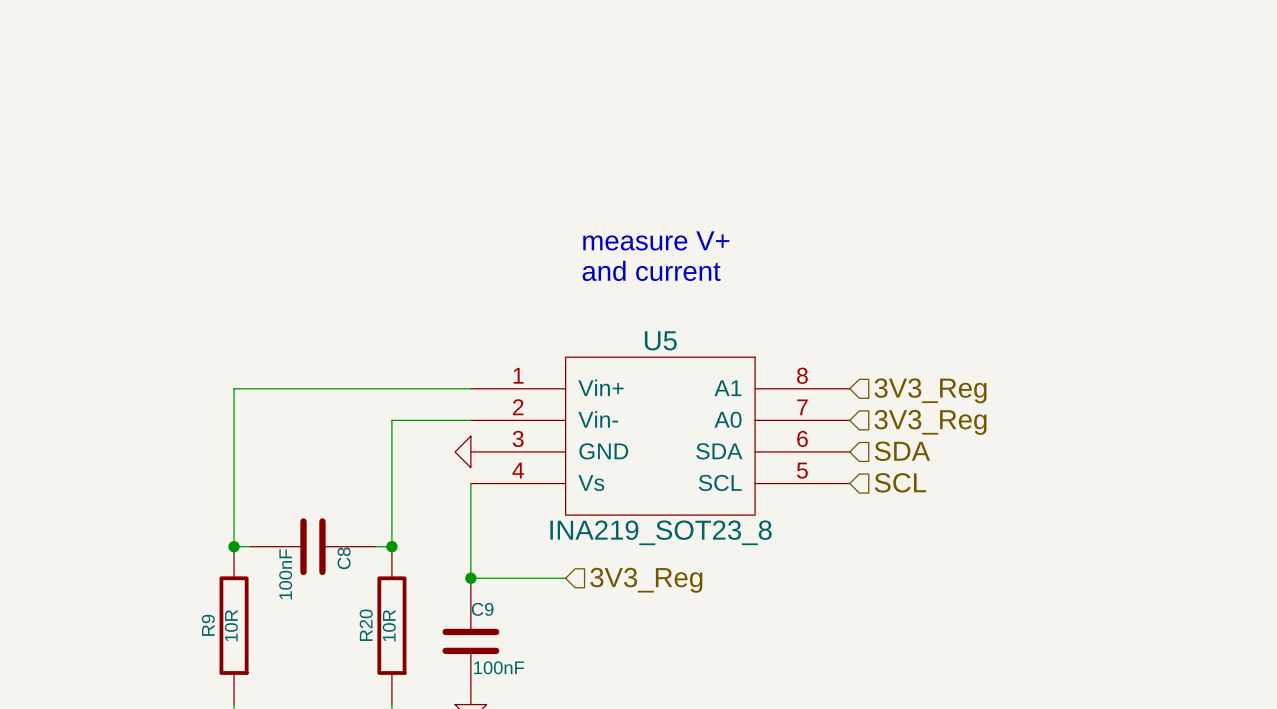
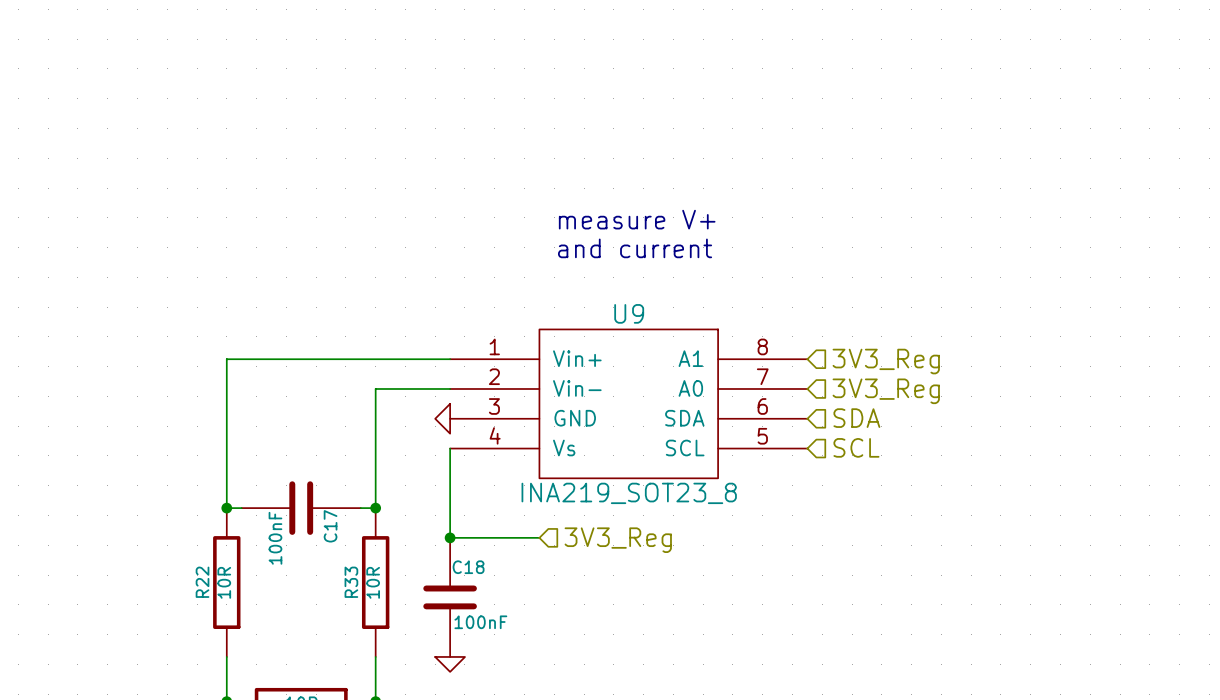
U5 name: U5 (660, 340) -> U9 (629, 313)
C8 name: C8 (344, 558) -> C17 (330, 526)
C9 name: C9 (482, 609) -> C18 (468, 567)
R9 name: R9 (208, 625) -> R22 (202, 582)
R20 name: R20 (366, 625) -> R33 (351, 582)

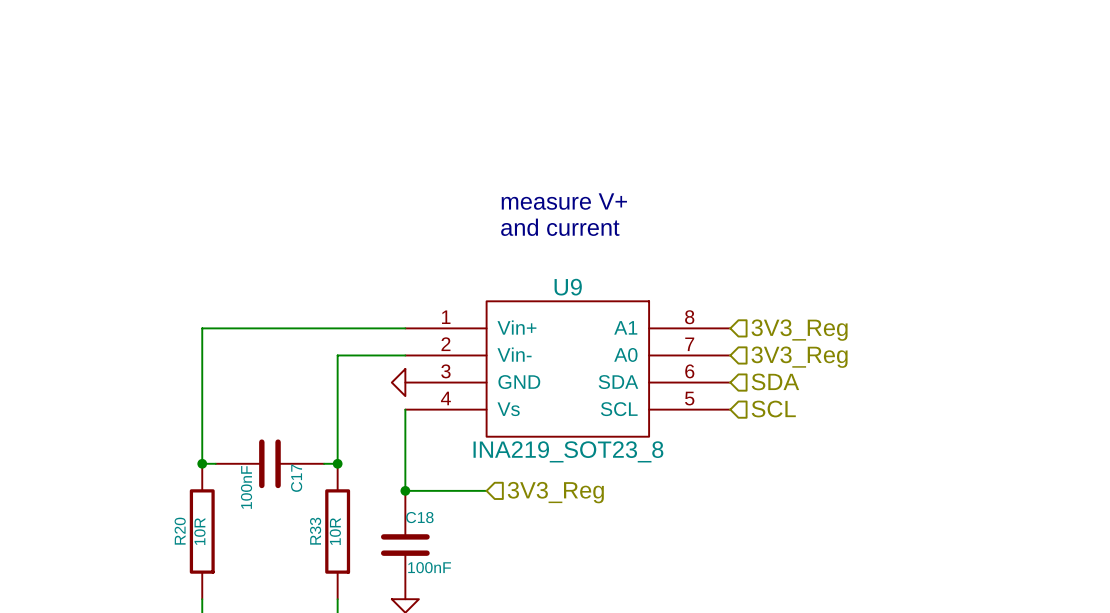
R22 name: R22 (202, 582) -> R20 (180, 531)

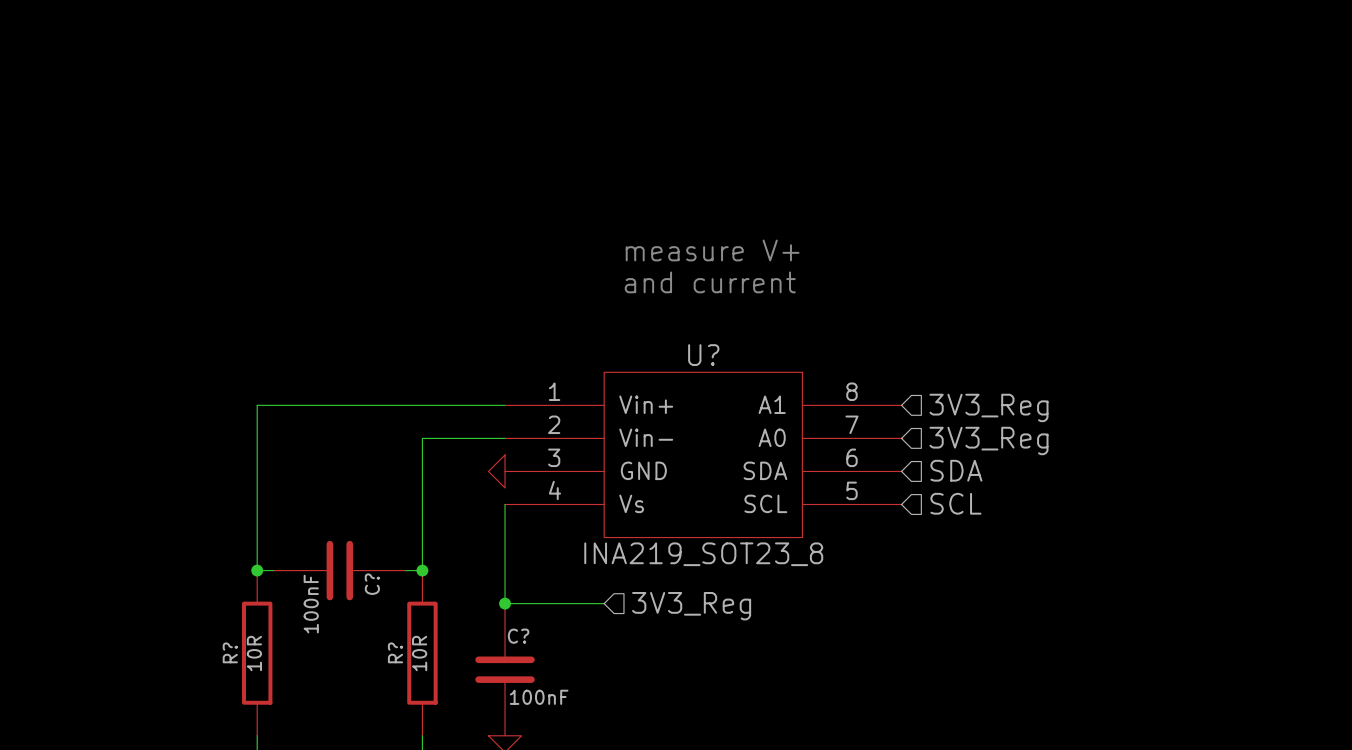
U9 name: U9 (568, 287) -> U? (703, 355)
C17 name: C17 (296, 478) -> C? (372, 584)
C18 name: C18 (419, 517) -> C? (518, 636)
R20 name: R20 (180, 531) -> R? (230, 652)
R33 name: R33 (315, 531) -> R? (395, 652)

